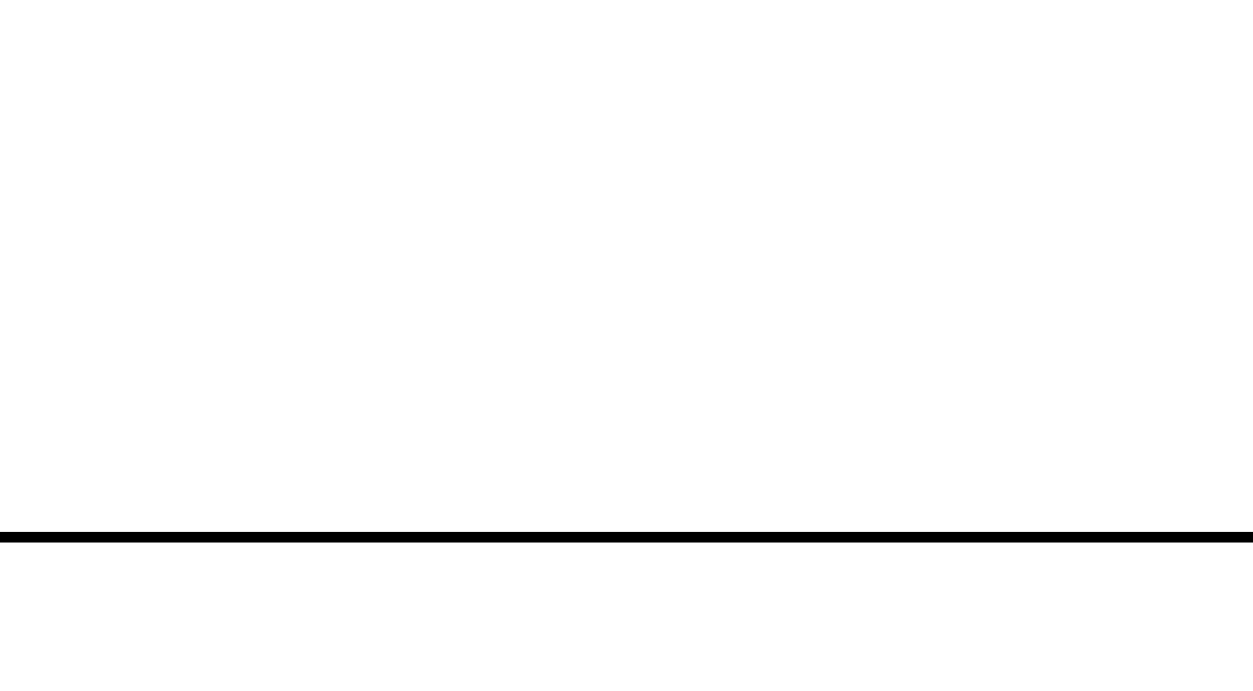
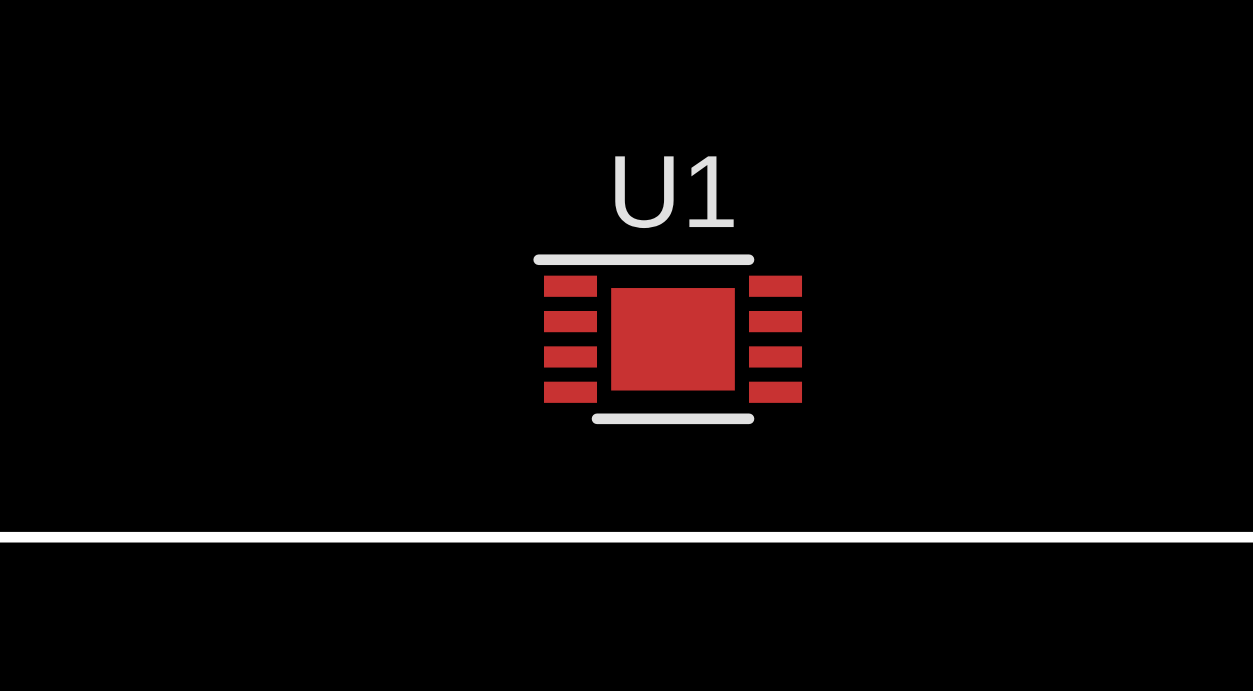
U1: none -> (667, 339)

